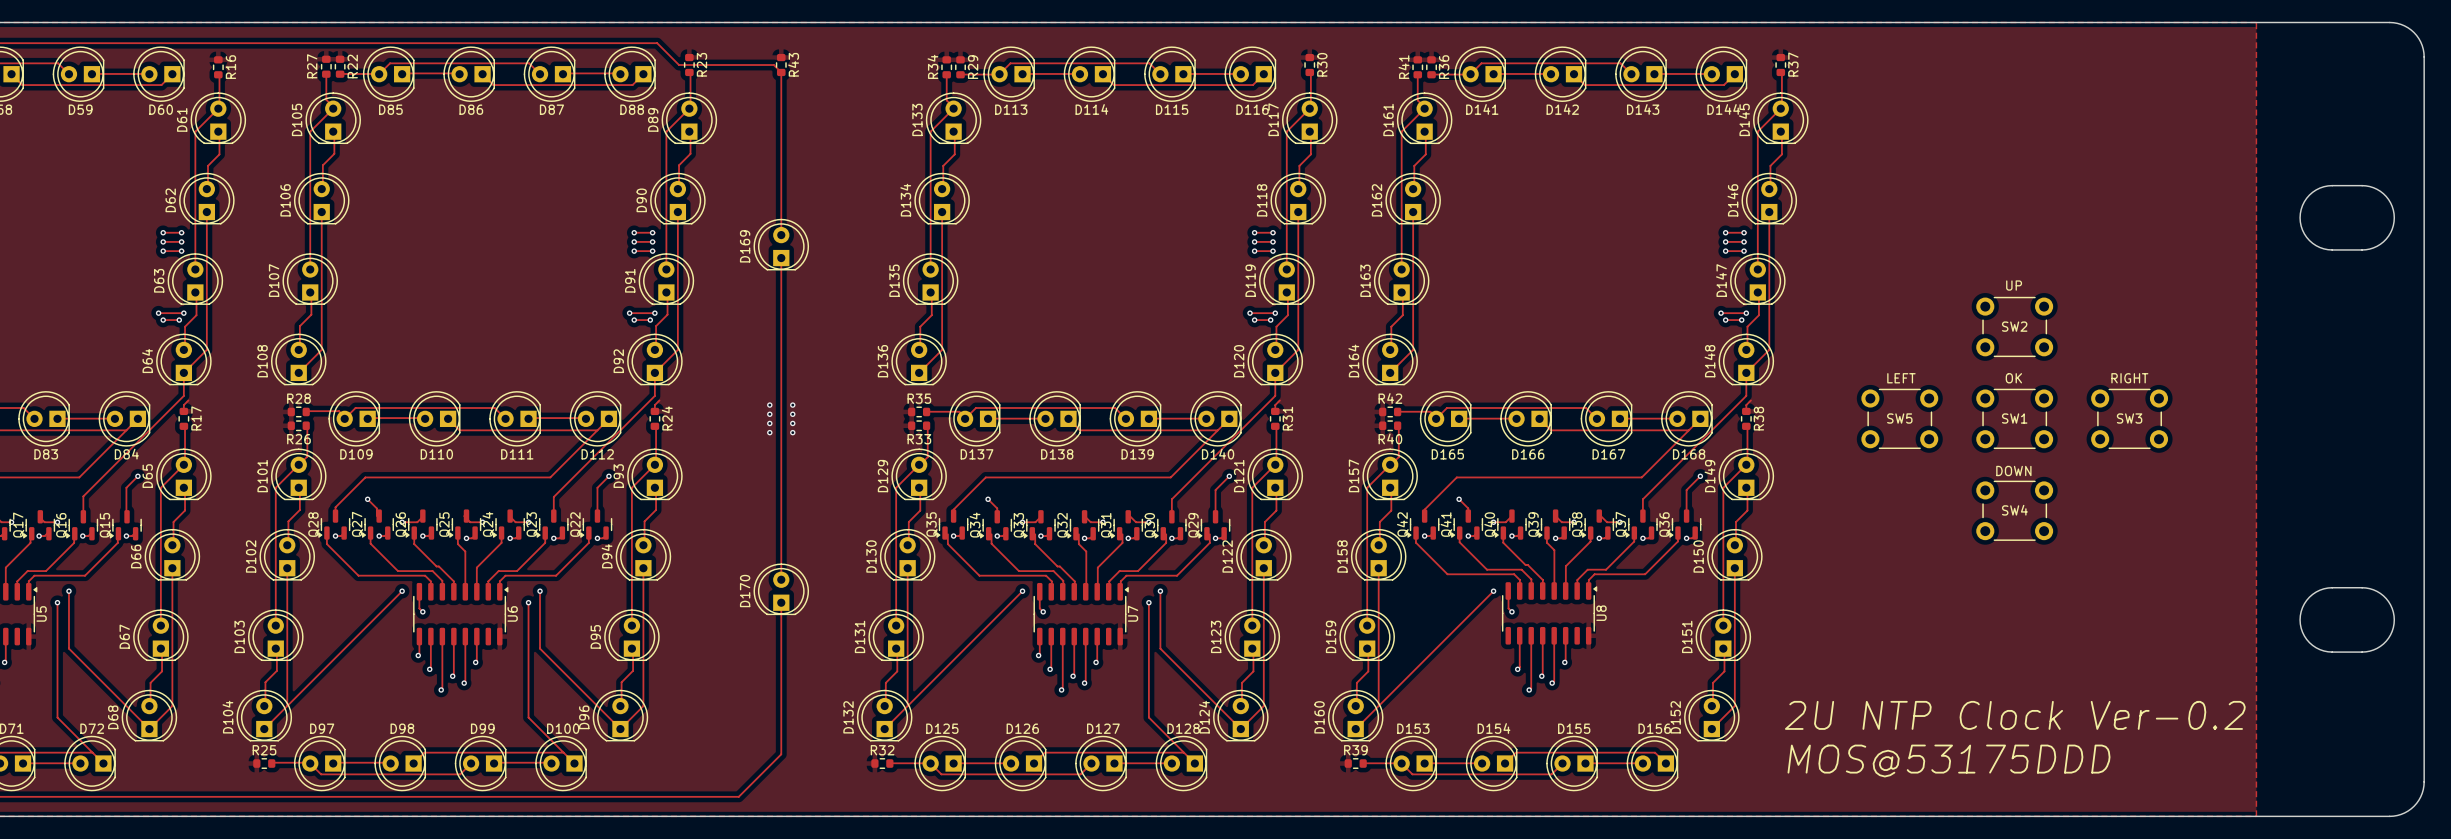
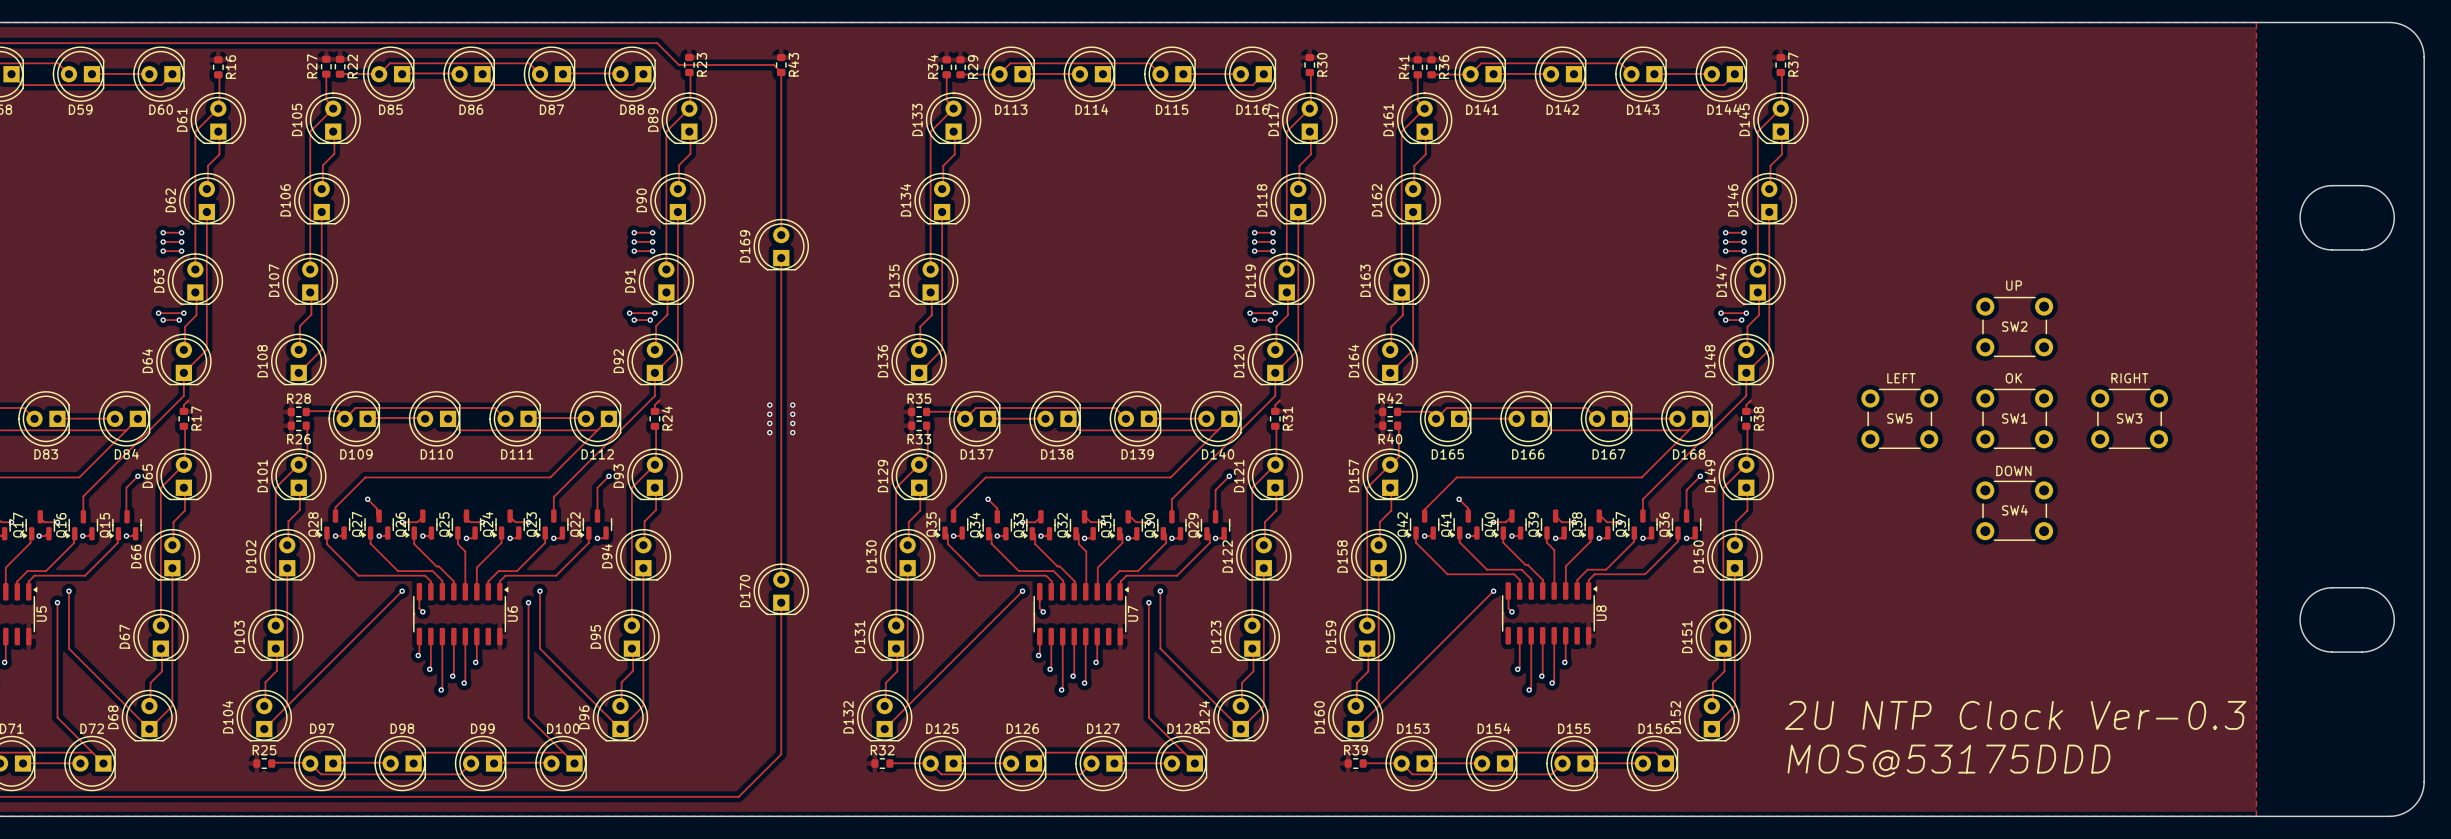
text: 2U NTP Clock Ver-0.2 (2015, 715) -> 2U NTP Clock Ver-0.3 (2015, 715)

